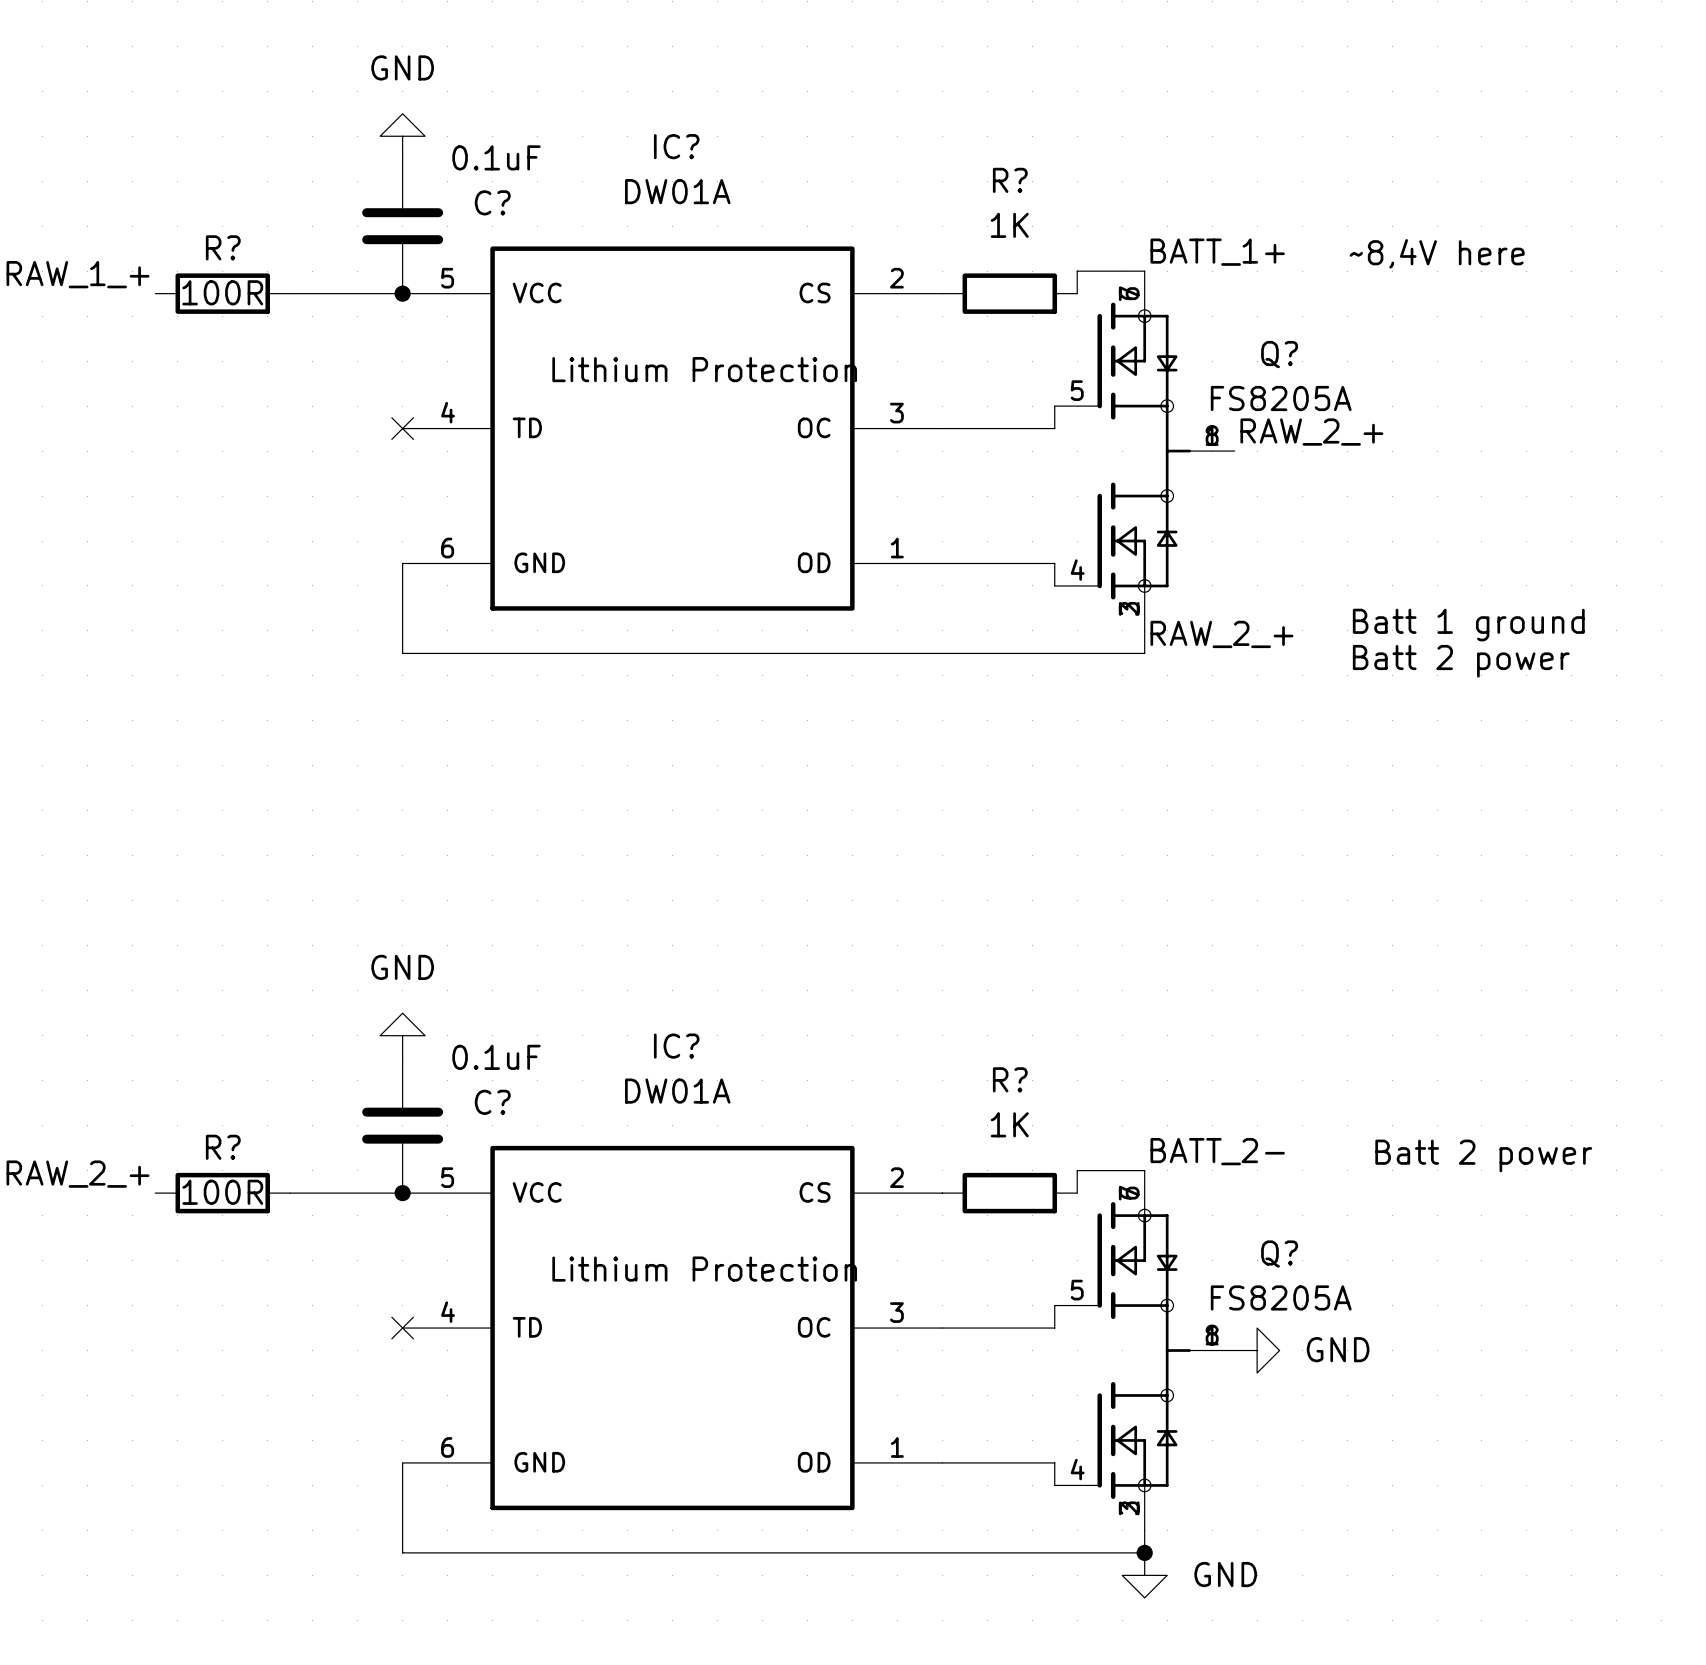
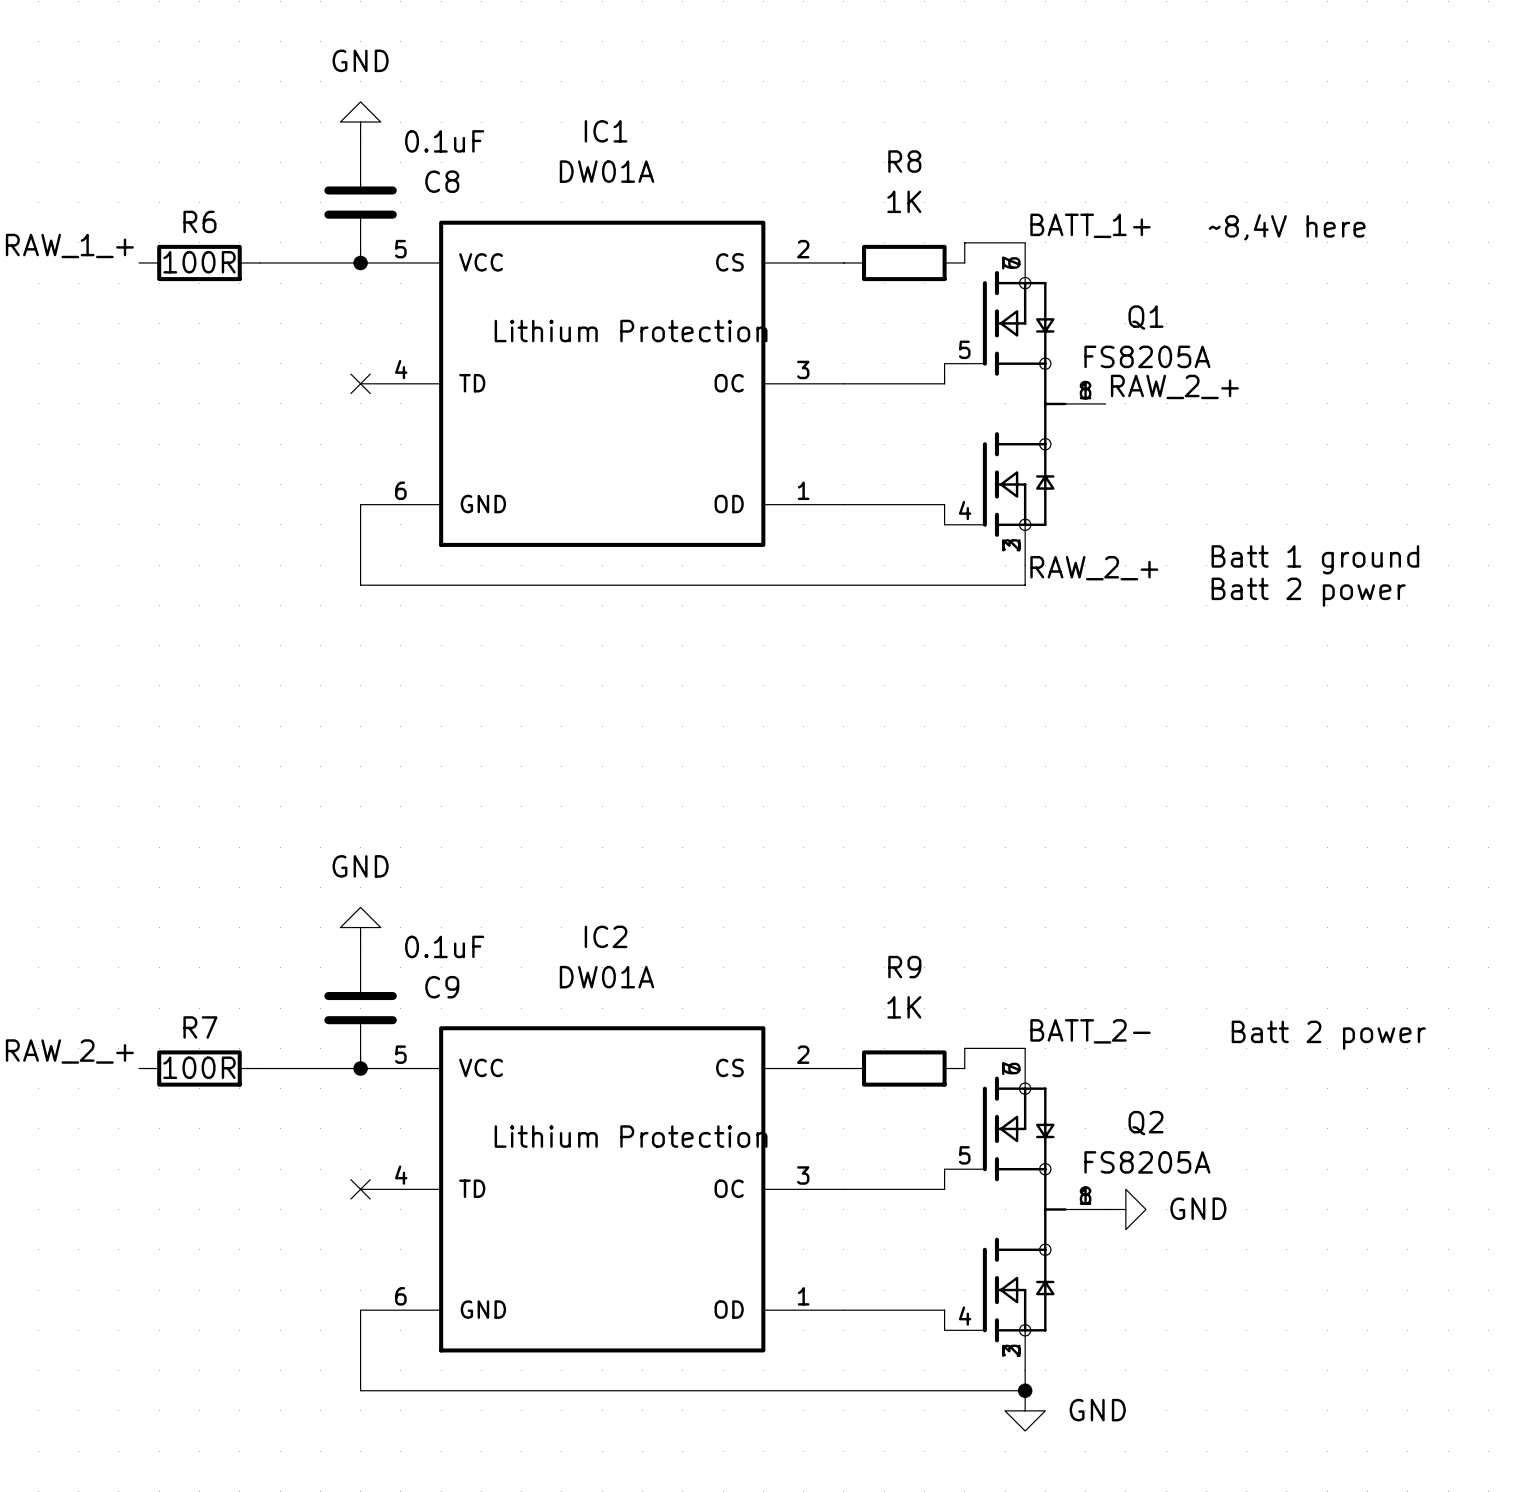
IC? name: IC? (676, 146) -> IC1 (606, 131)
R? name: R? (1010, 180) -> R8 (904, 161)
C? name: C? (492, 202) -> C8 (442, 181)
R? name: R? (223, 247) -> R6 (199, 221)
Q? name: Q? (1279, 354) -> Q1 (1145, 317)
IC? name: IC? (676, 1046) -> IC2 (606, 936)
R? name: R? (1010, 1079) -> R9 (904, 967)
C? name: C? (492, 1102) -> C9 (442, 987)
R? name: R? (223, 1147) -> R7 (200, 1027)
Q? name: Q? (1279, 1254) -> Q2 (1145, 1123)

